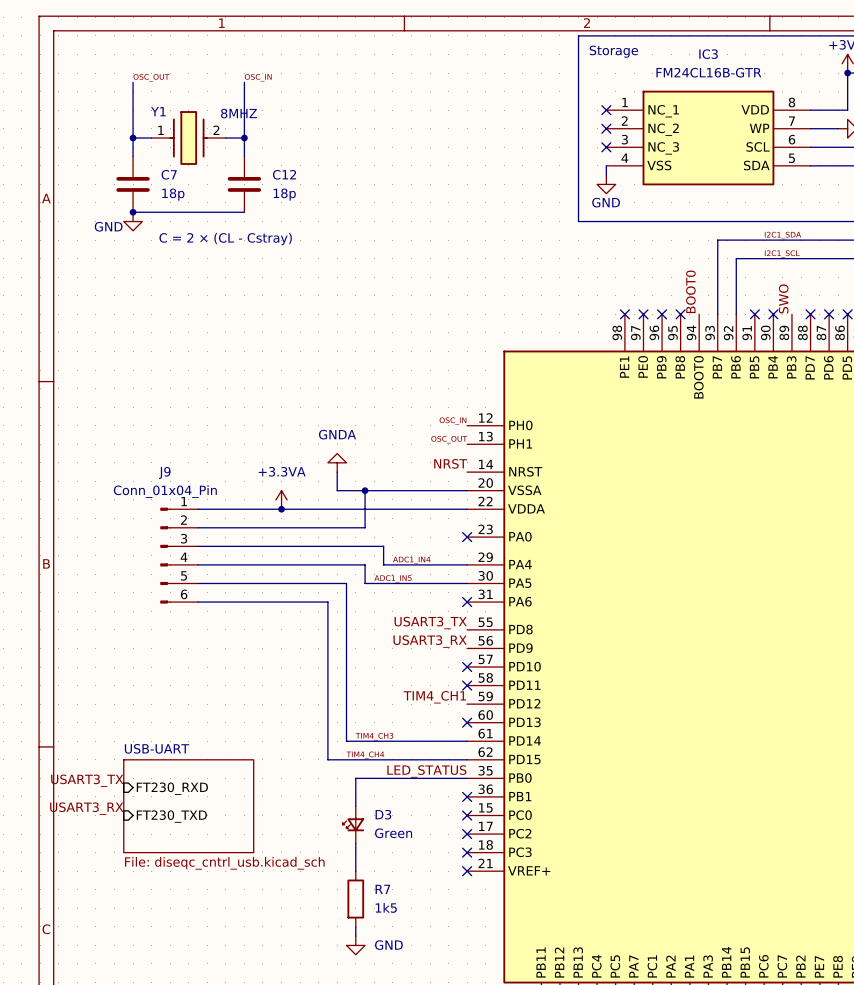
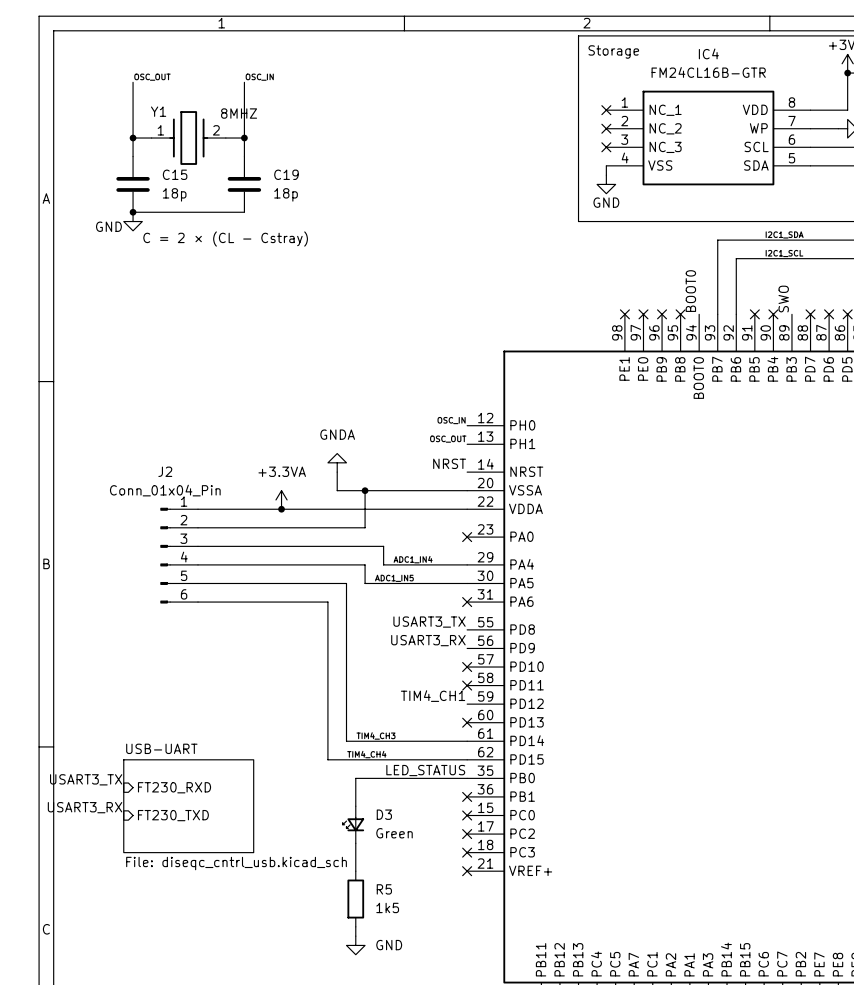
IC3 name: IC3 (708, 54) -> IC4 (708, 53)
C7 name: C7 (169, 174) -> C15 (175, 174)
C12 name: C12 (284, 174) -> C19 (286, 174)
J9 name: J9 (164, 472) -> J2 (165, 471)
R7 name: R7 (382, 889) -> R5 (384, 889)

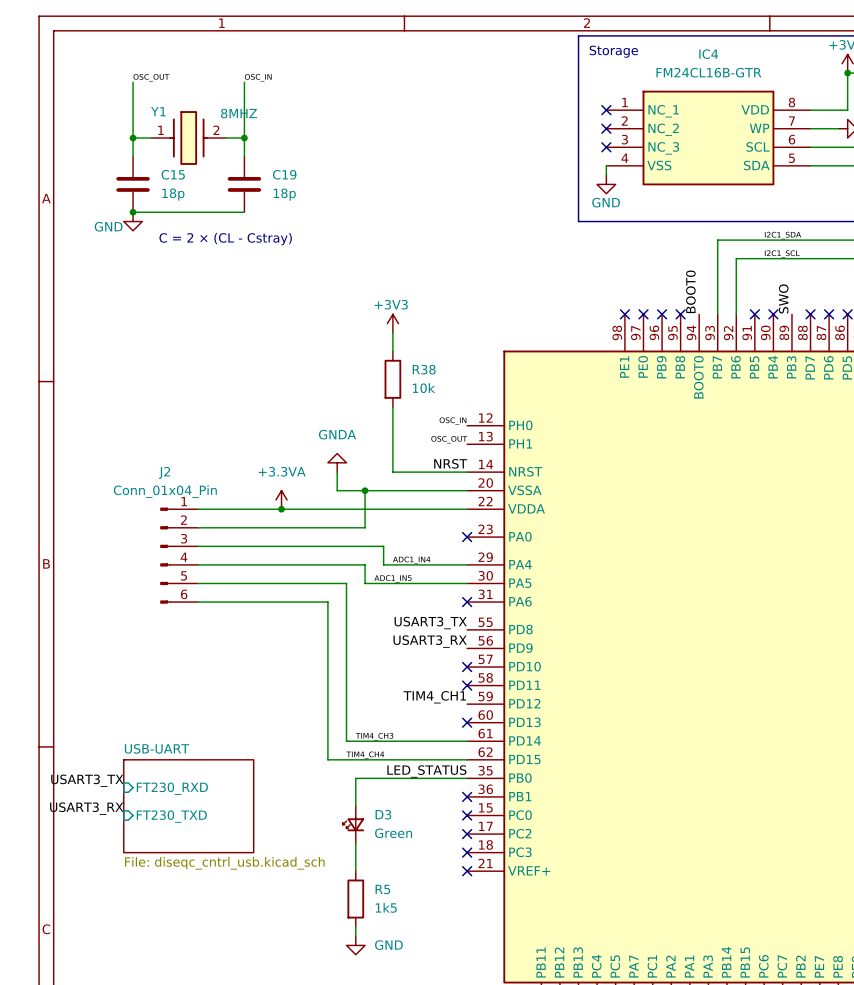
power symbol: none -> +3V3 (392, 323)
wire: none -> (392, 332) (392, 351)
R38: none -> 10k (392, 379)
wire: none -> (392, 407) (392, 472) (467, 472)

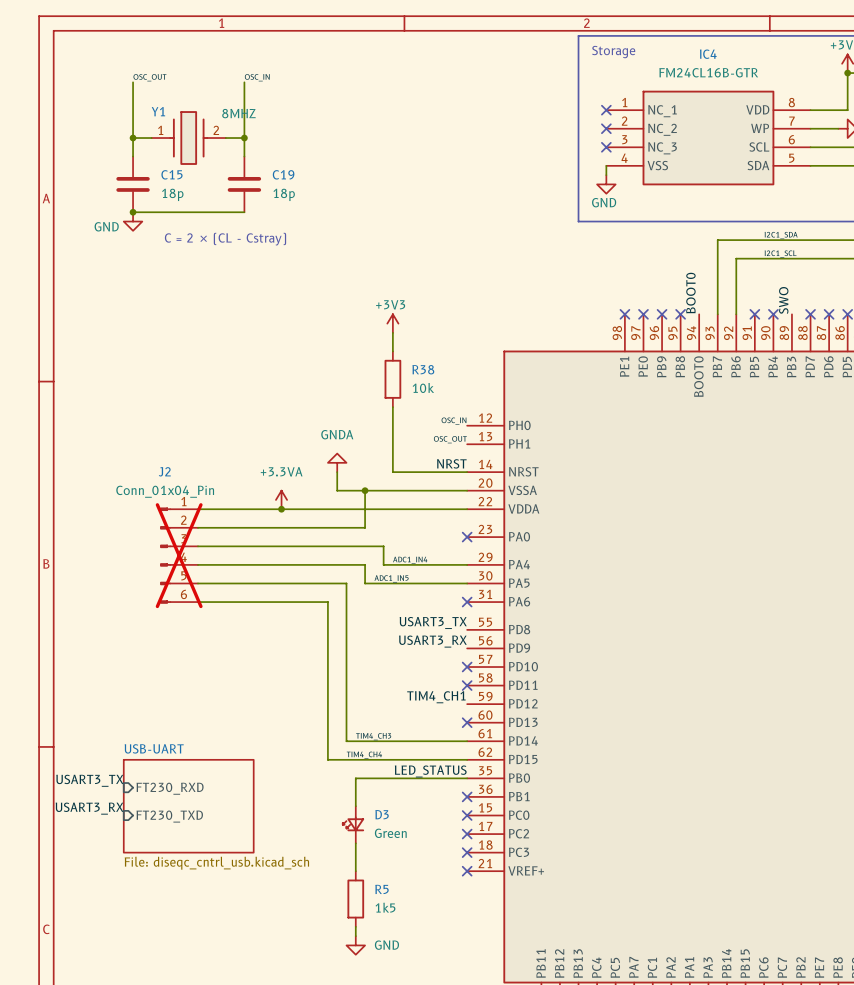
J2 do-not-place cross: none -> (179, 555)

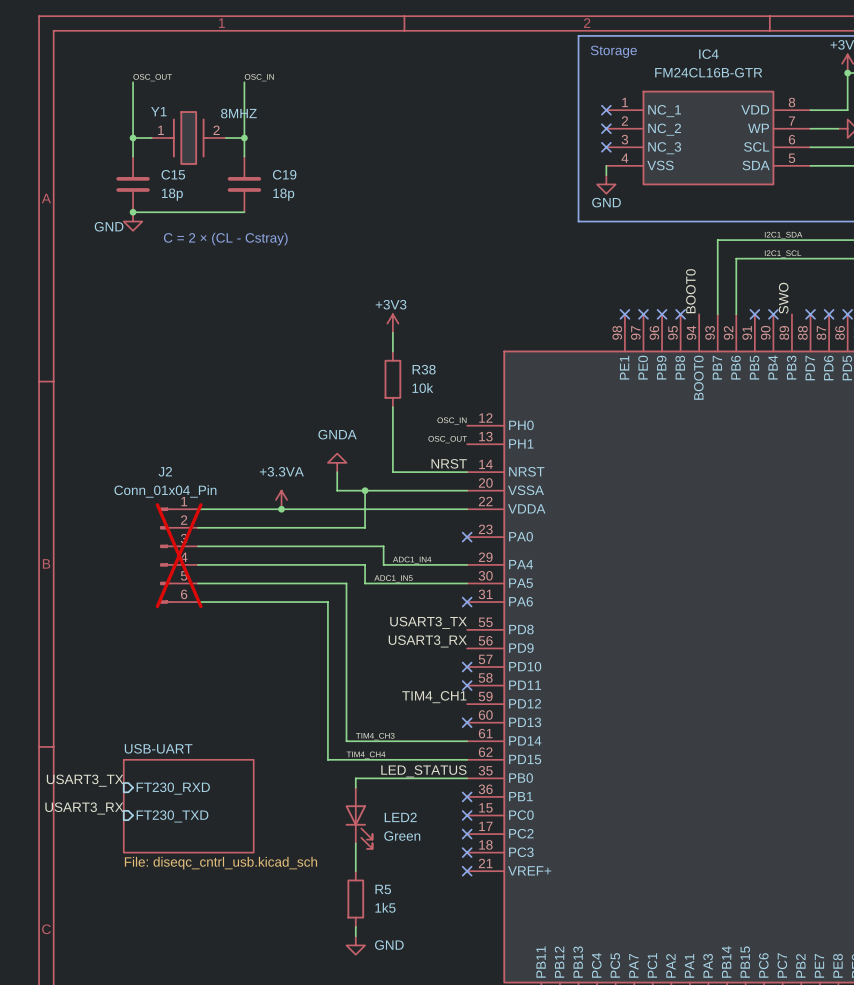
LED2: none -> Green (359, 818)
D3: Green (353, 824) -> none

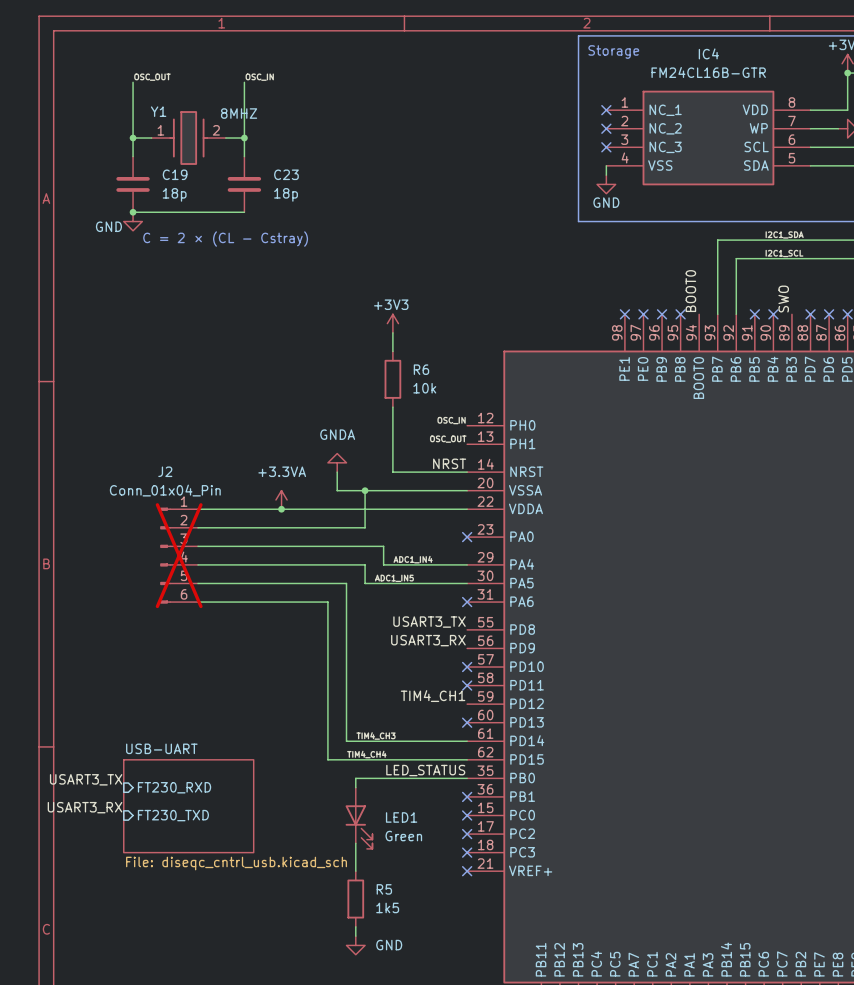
C15 name: C15 (173, 174) -> C19 (175, 174)
C19 name: C19 (284, 174) -> C23 (286, 174)
R38 name: R38 (424, 369) -> R6 (421, 369)
LED2 name: LED2 (400, 817) -> LED1 (401, 817)

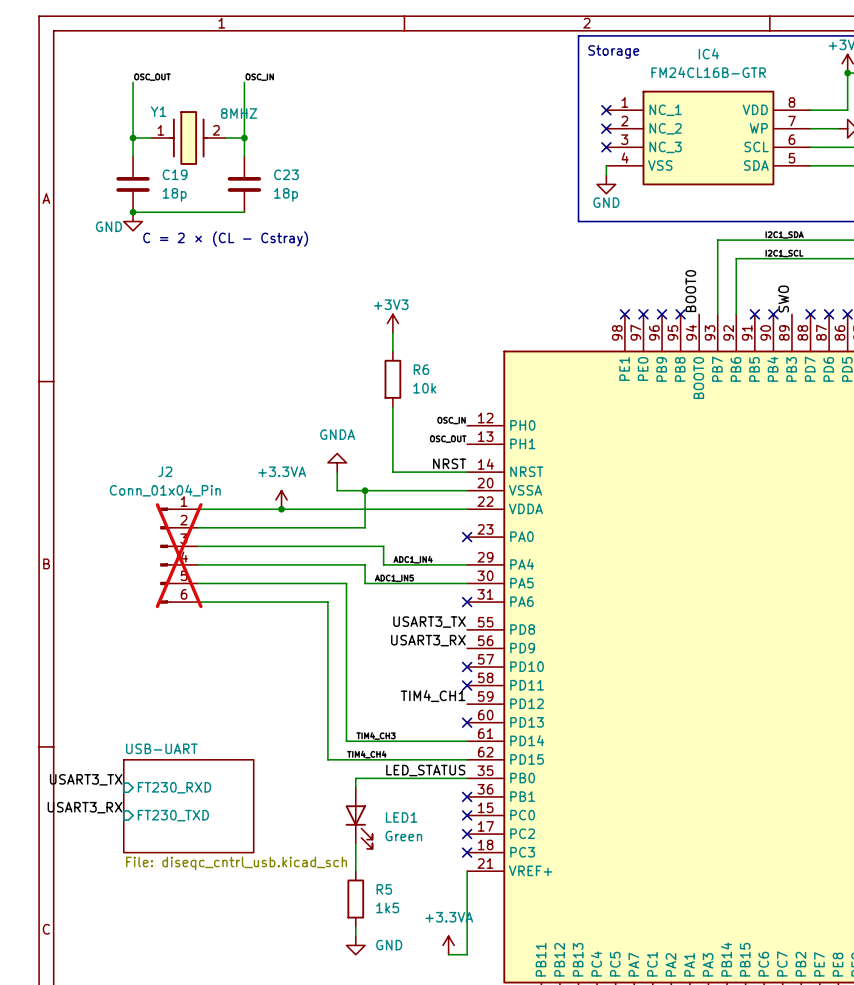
wire: none -> (467, 871) (467, 954) (448, 954)
no-connect mark: (467, 871) -> none
power symbol: none -> +3.3VA (448, 945)

